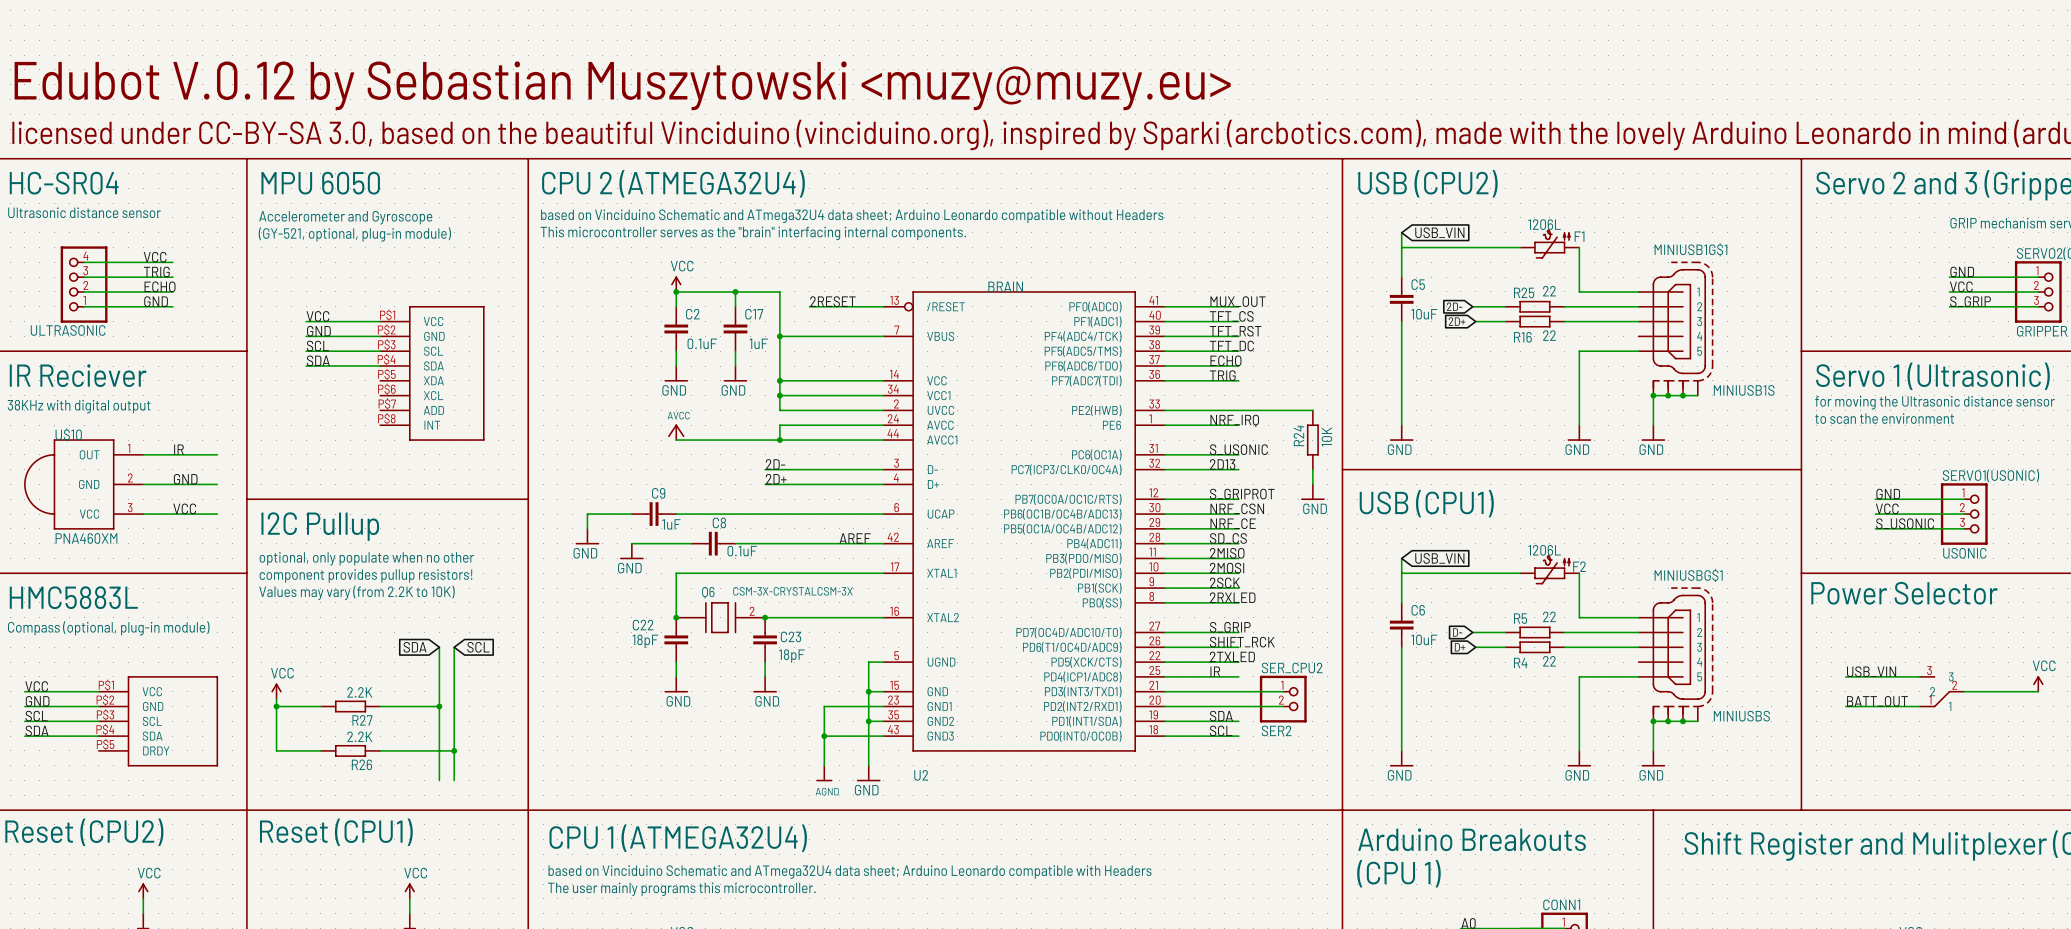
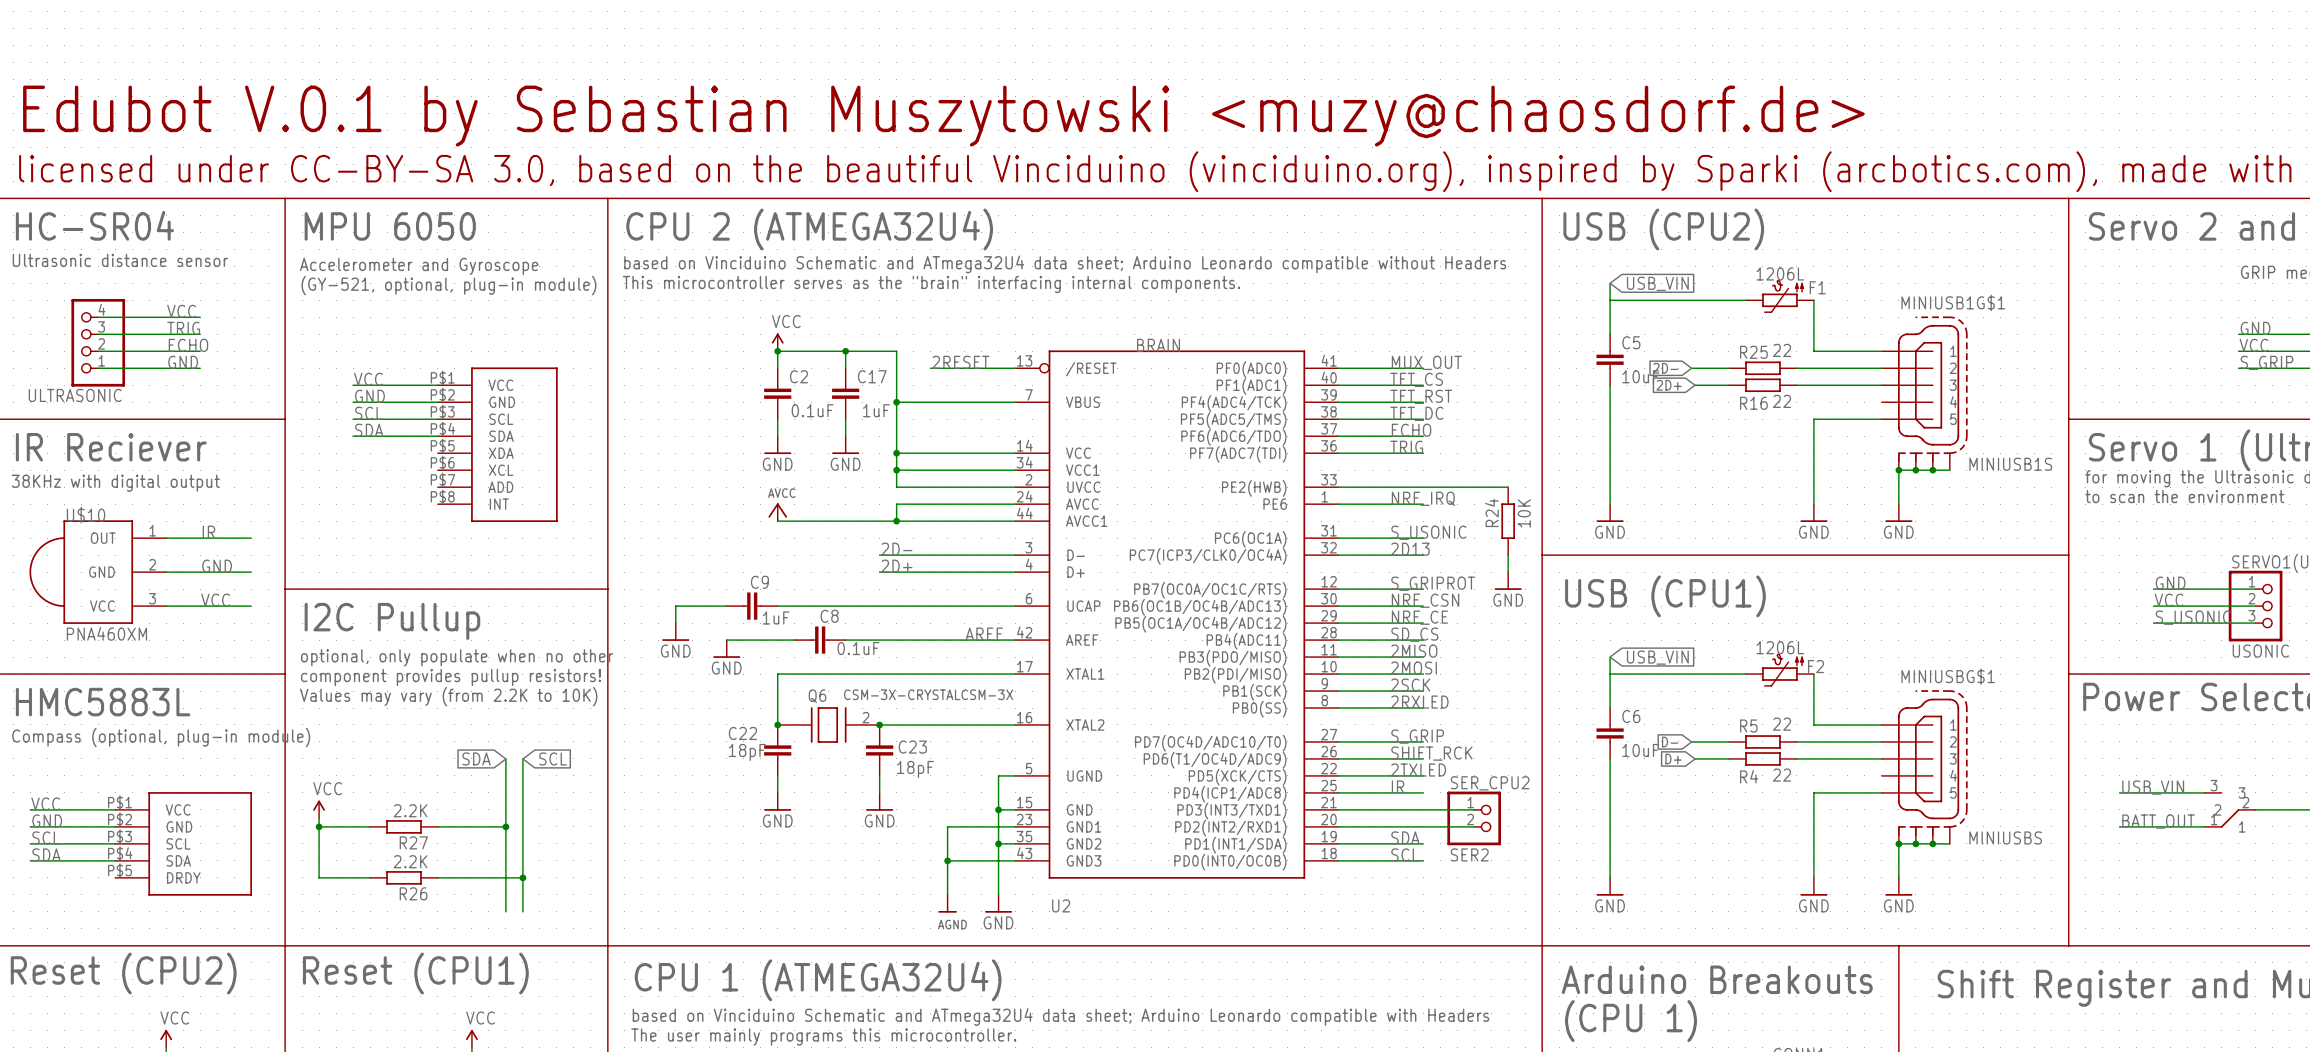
text: Edubot V.0.12 by Sebastian Muszytowski <muzy@muzy.eu> (622, 85) -> Edubot V.0.1 by Sebastian Muszytowski <muzy@chaosdorf.de> (943, 116)

